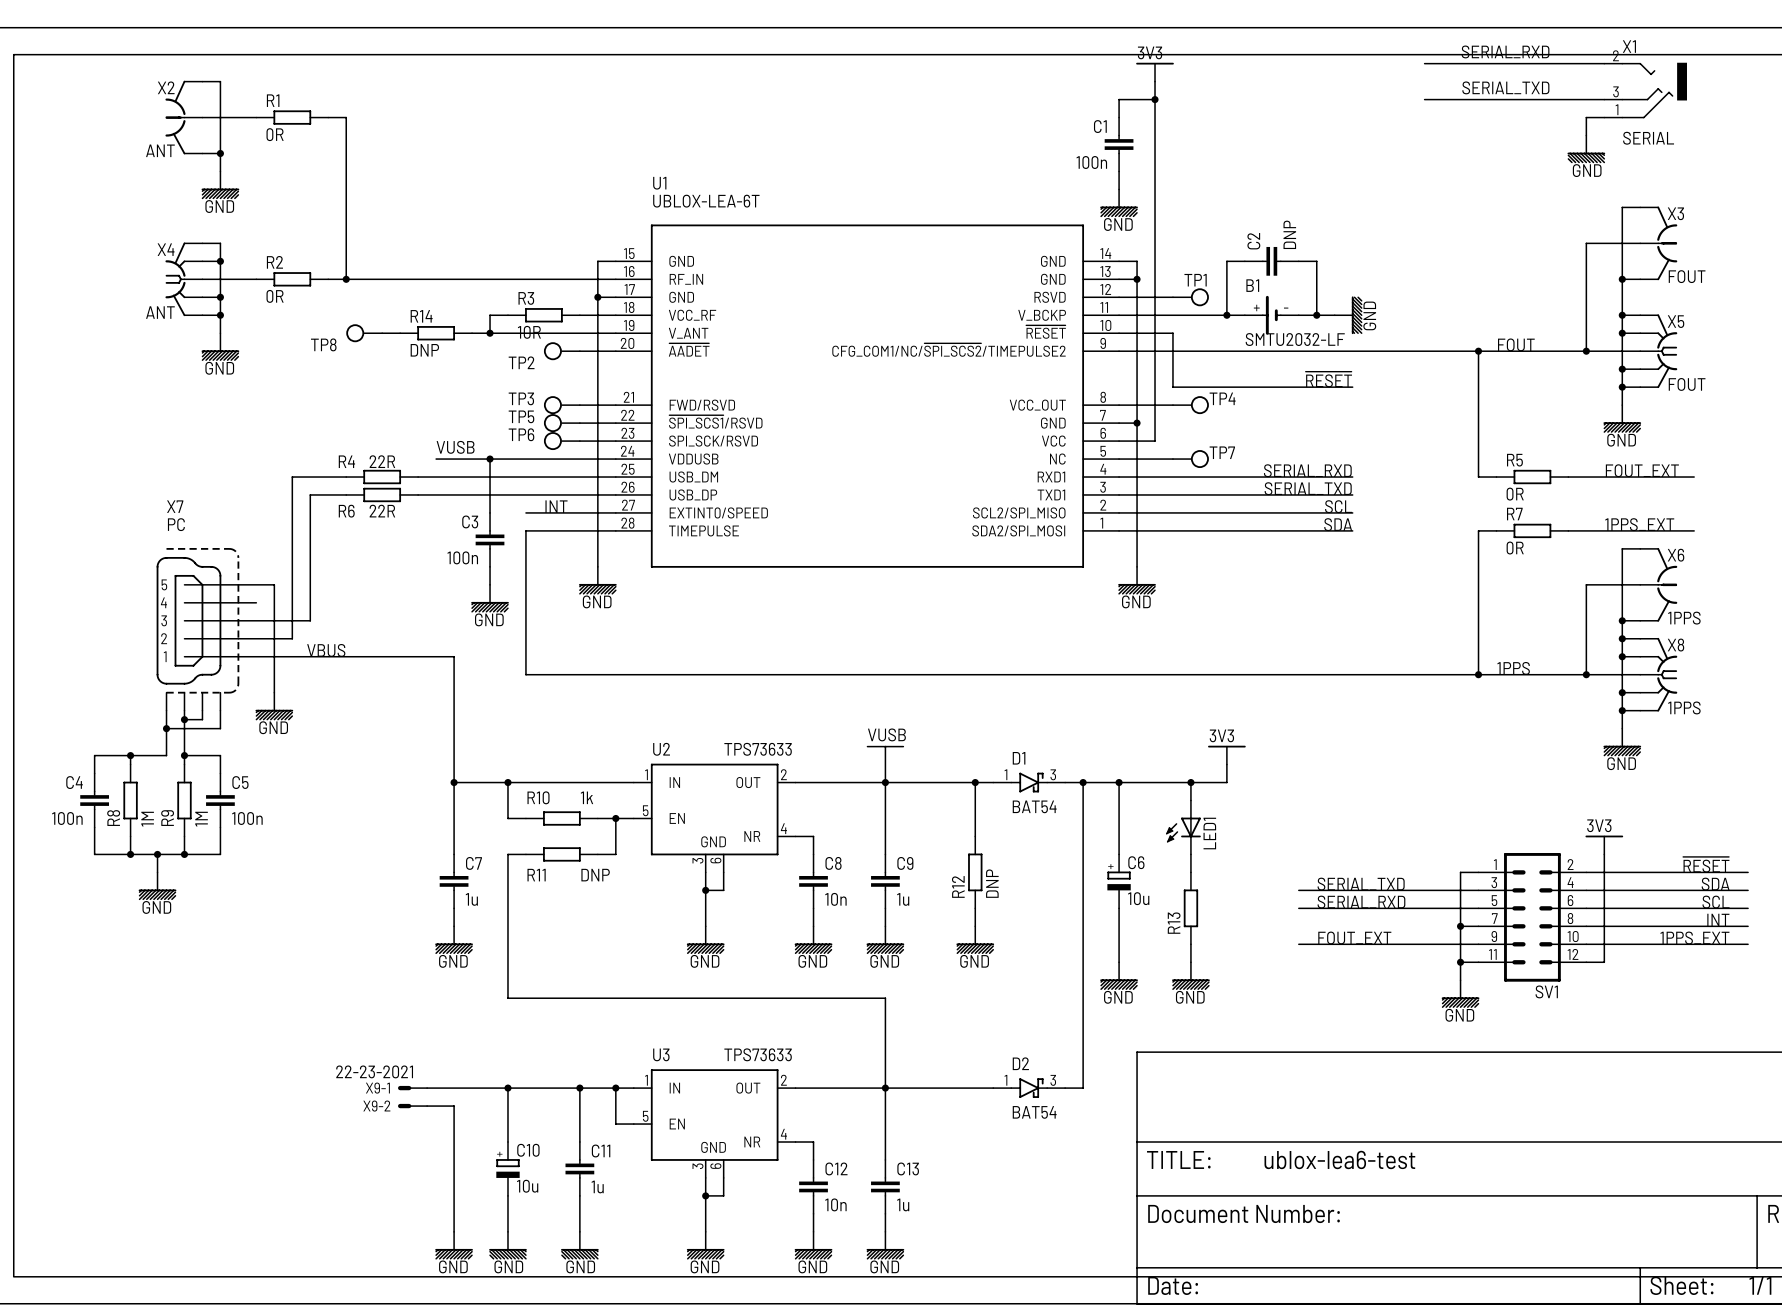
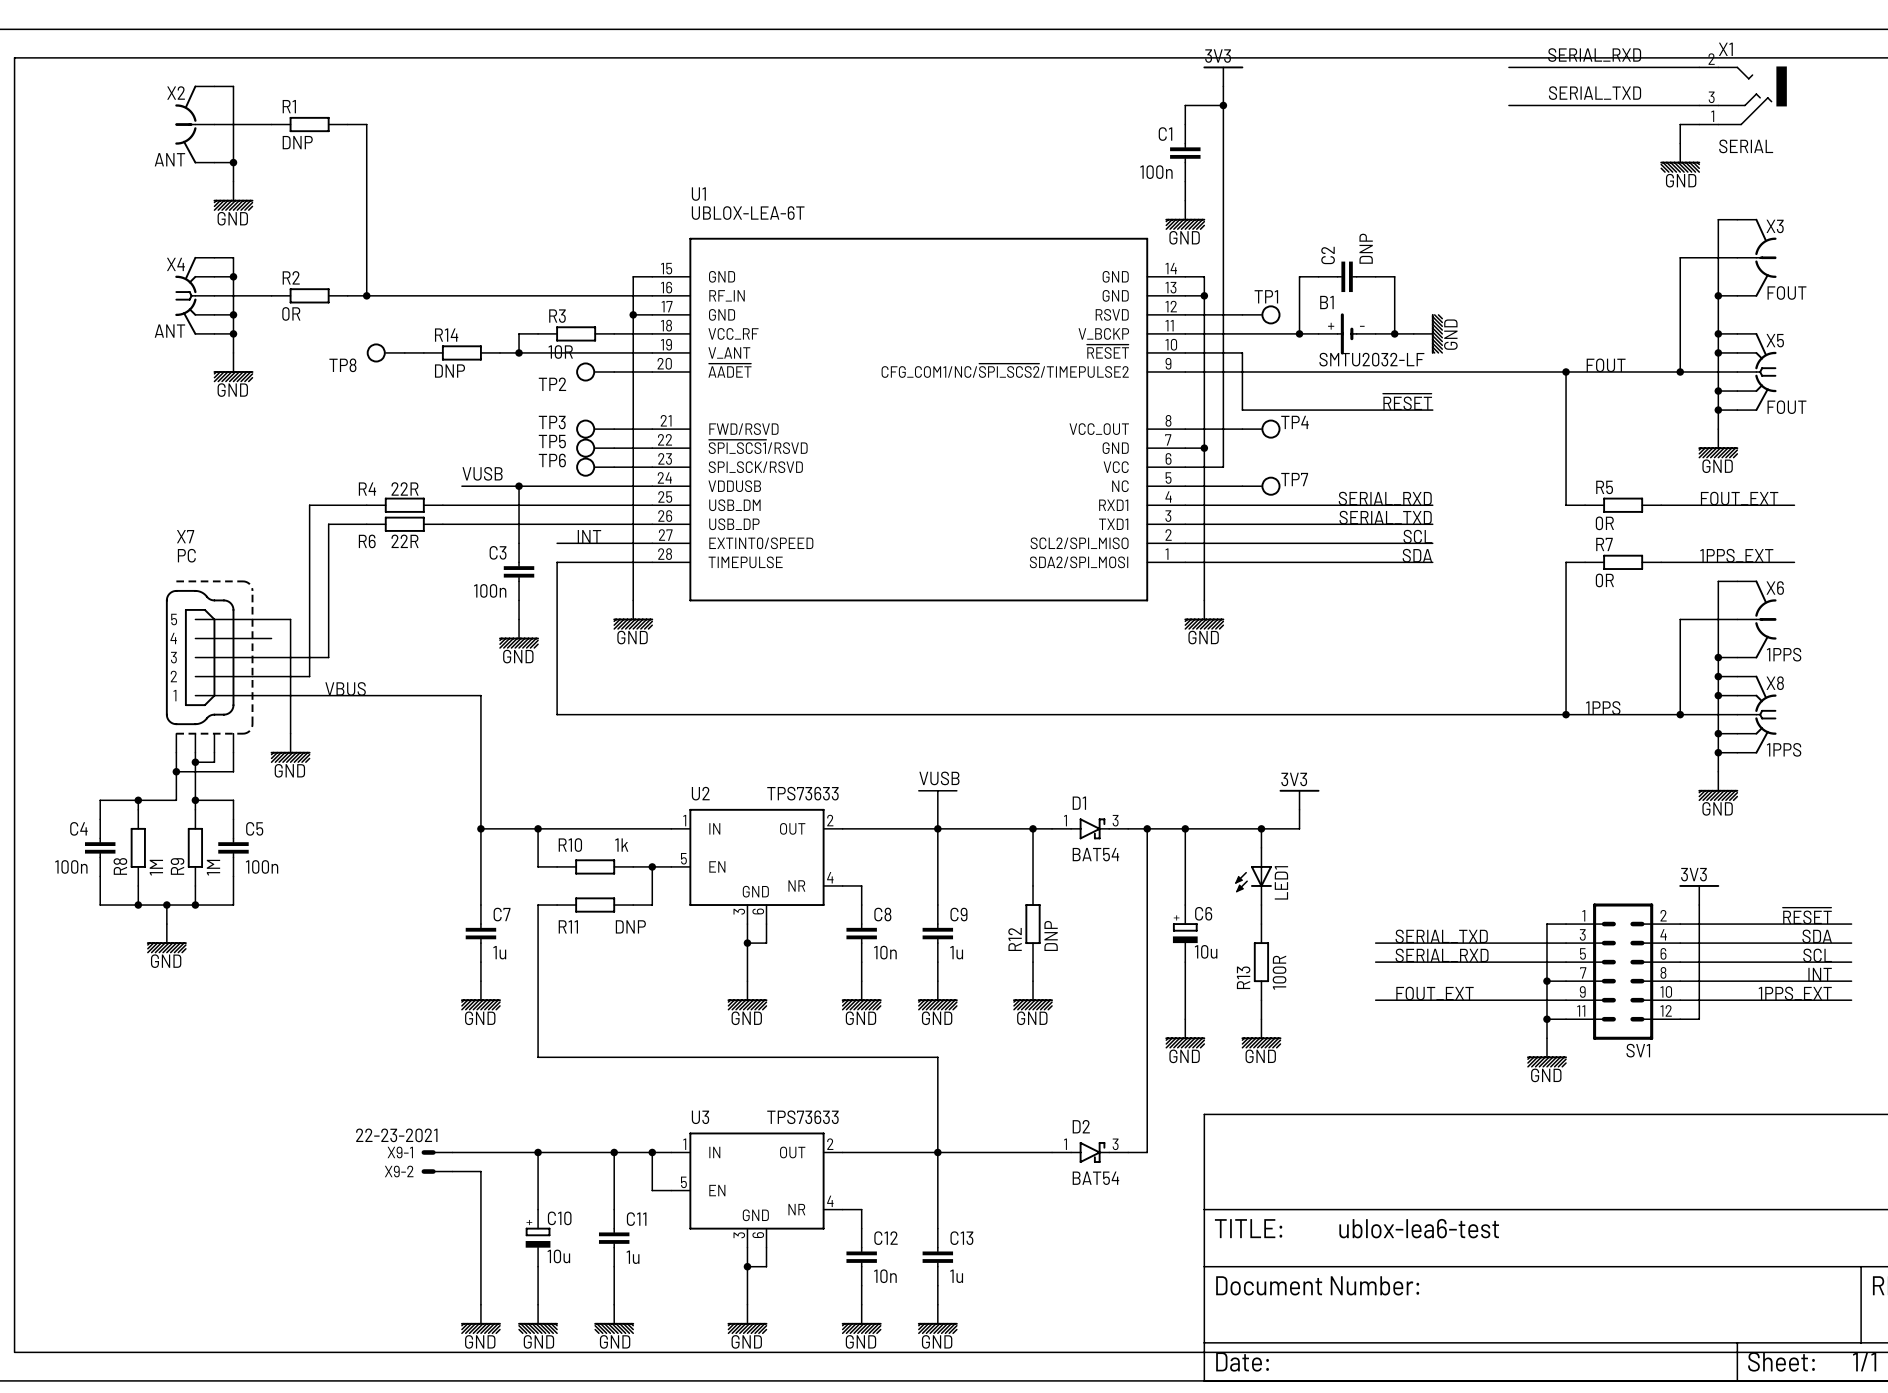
R1 value: 0R (275, 134) -> DNP (297, 142)
R13 value: none -> 100R (1279, 972)

